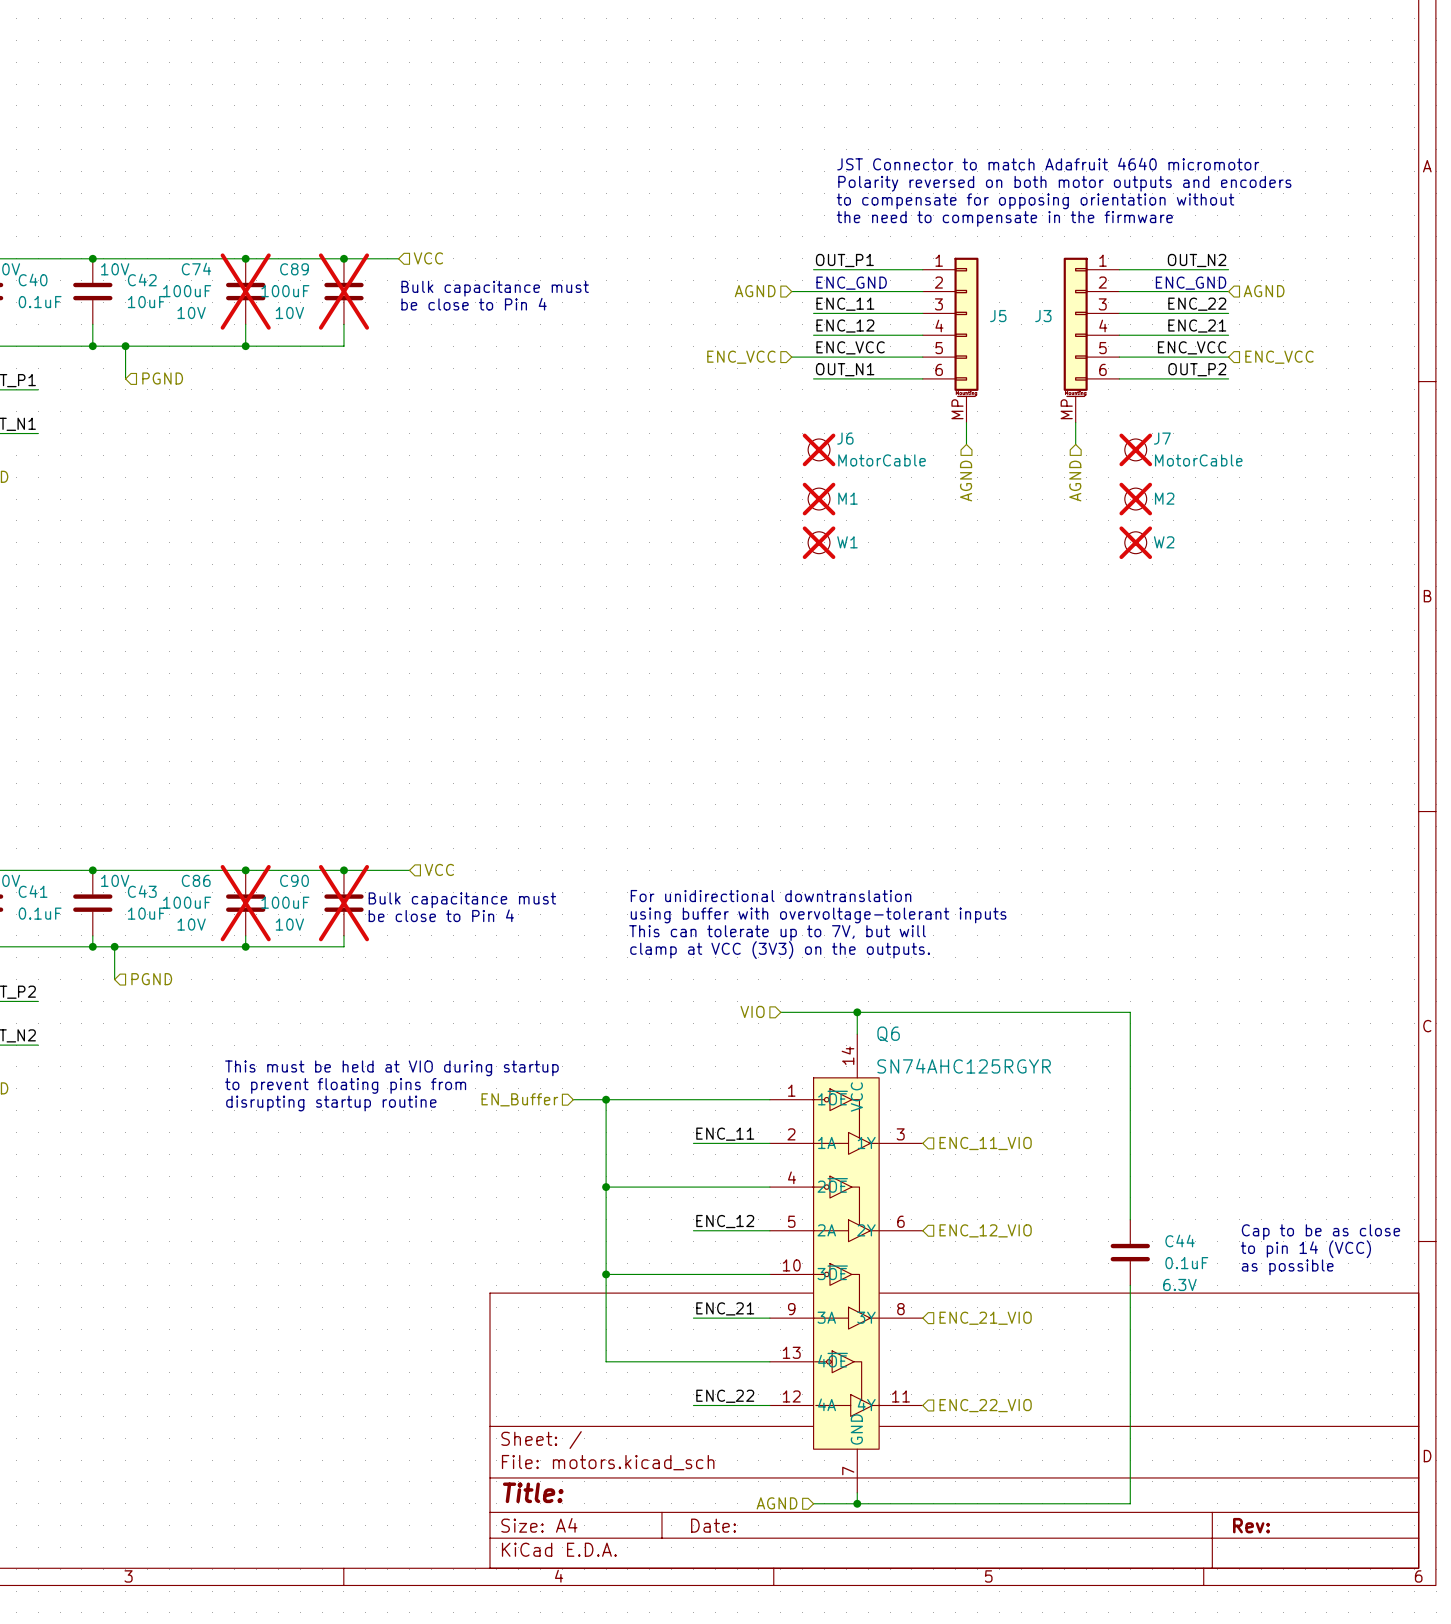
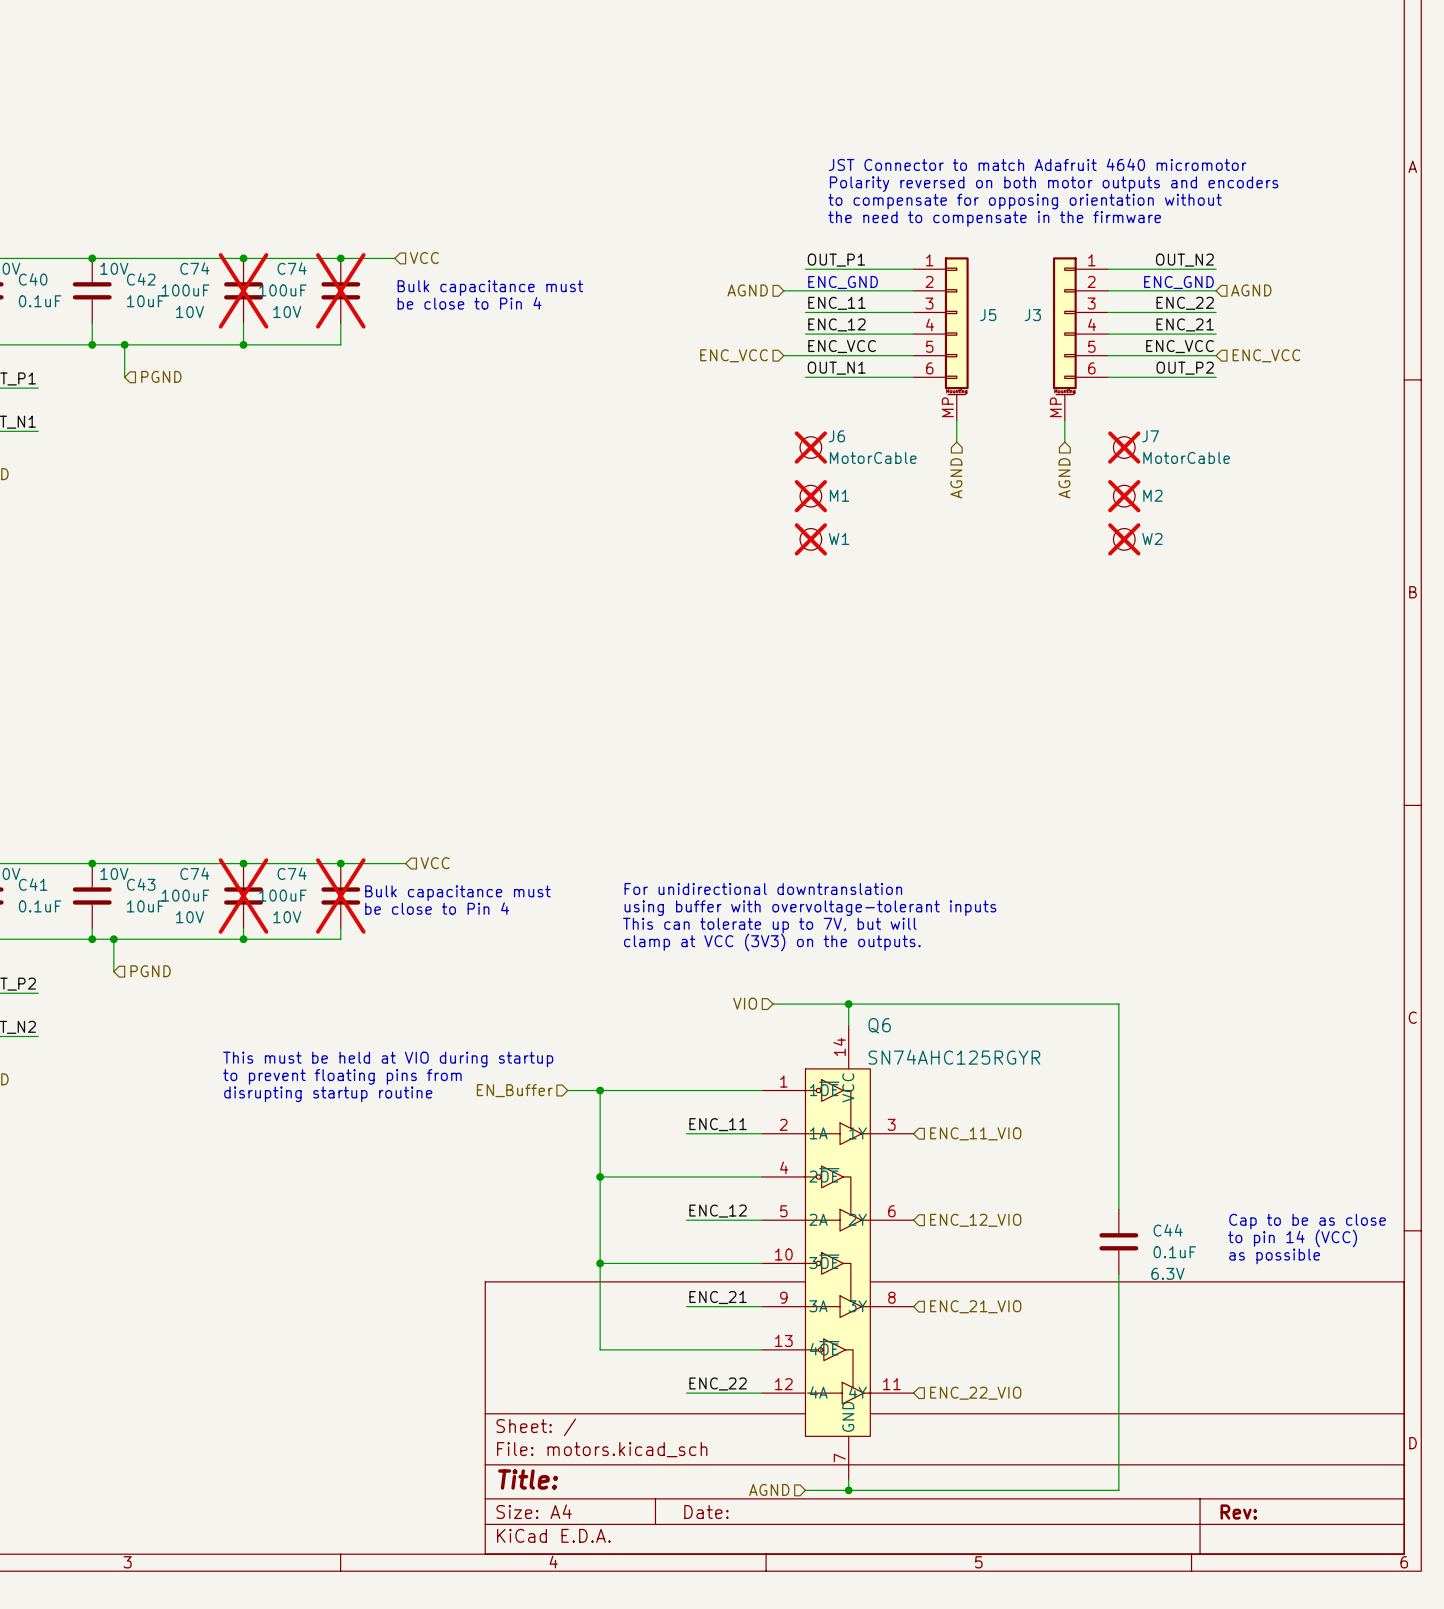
C89 name: C89 (294, 269) -> C74 (292, 268)
C86 name: C86 (196, 880) -> C74 (194, 873)
C90 name: C90 (294, 880) -> C74 (292, 873)

